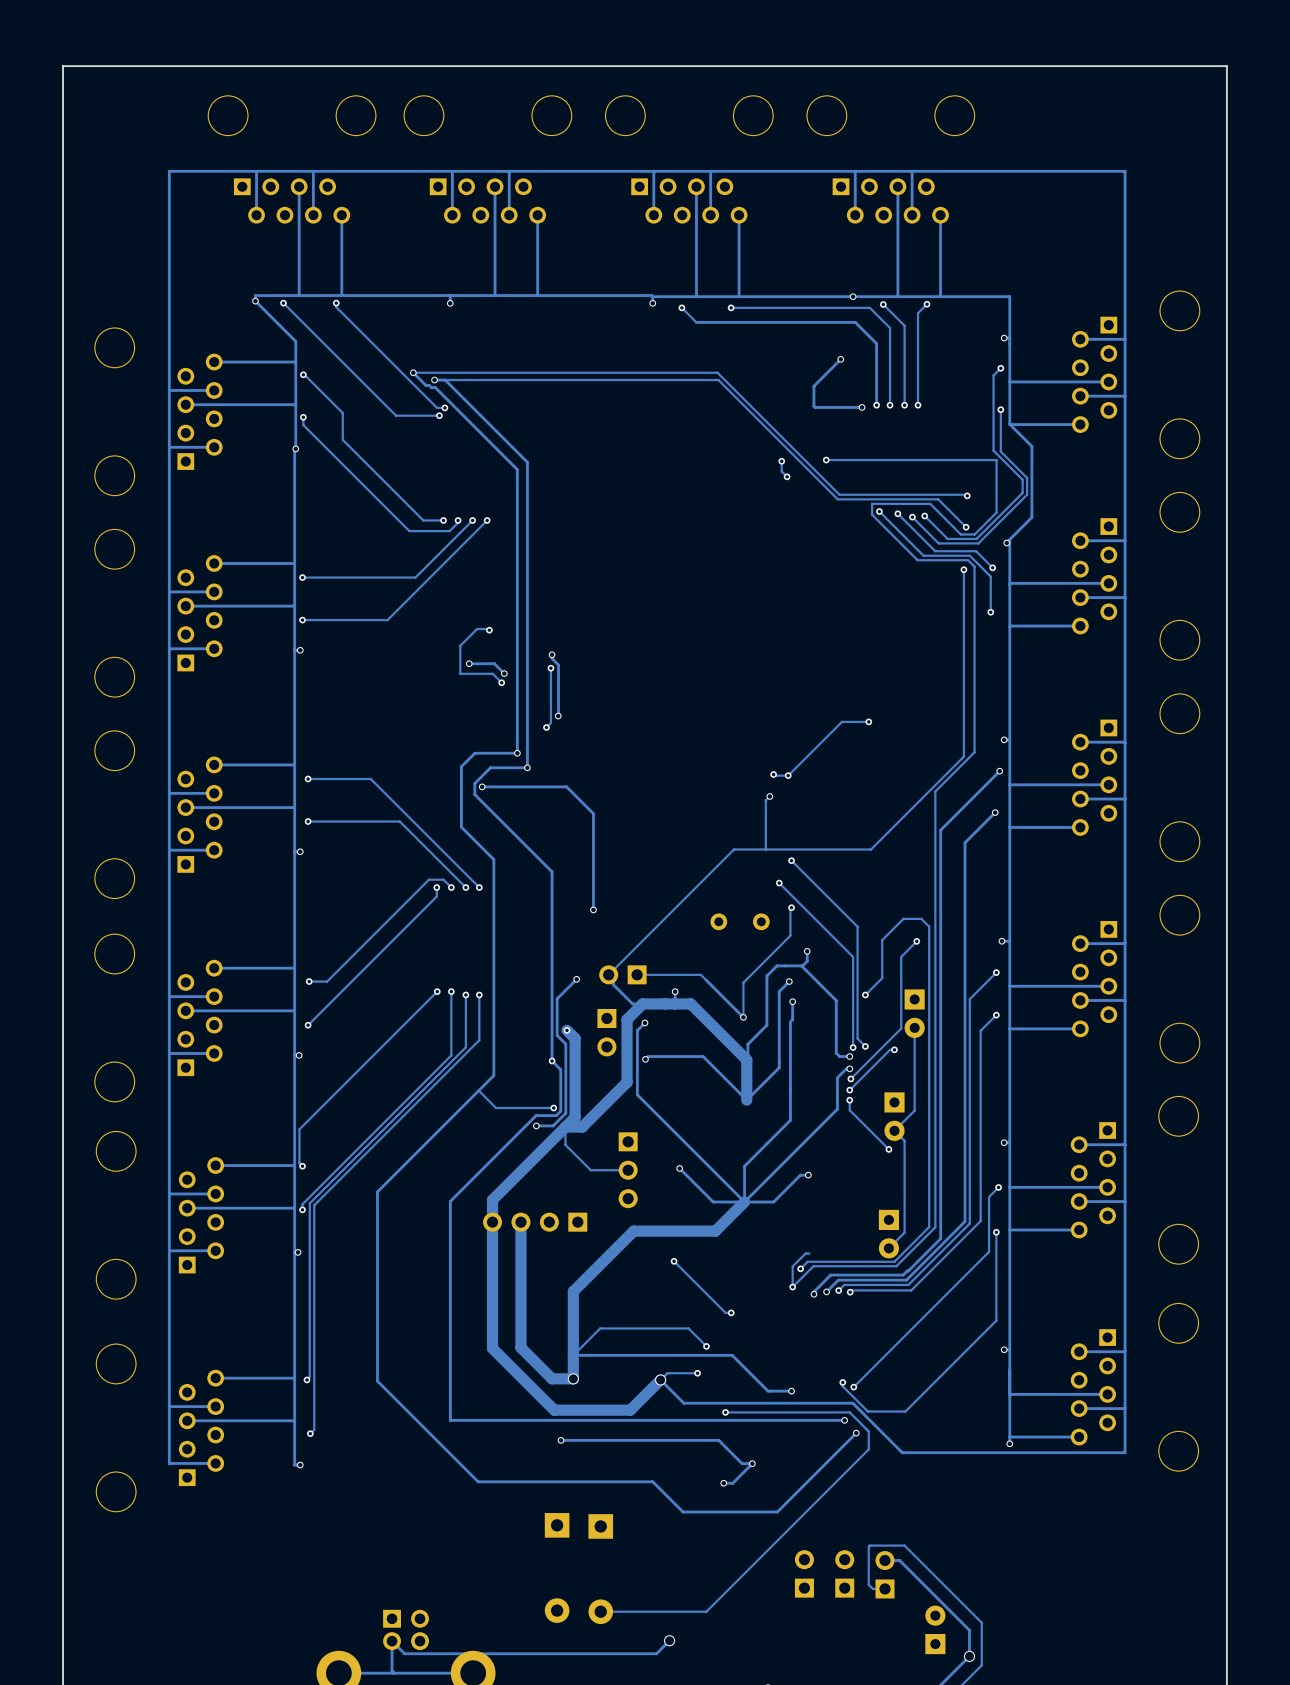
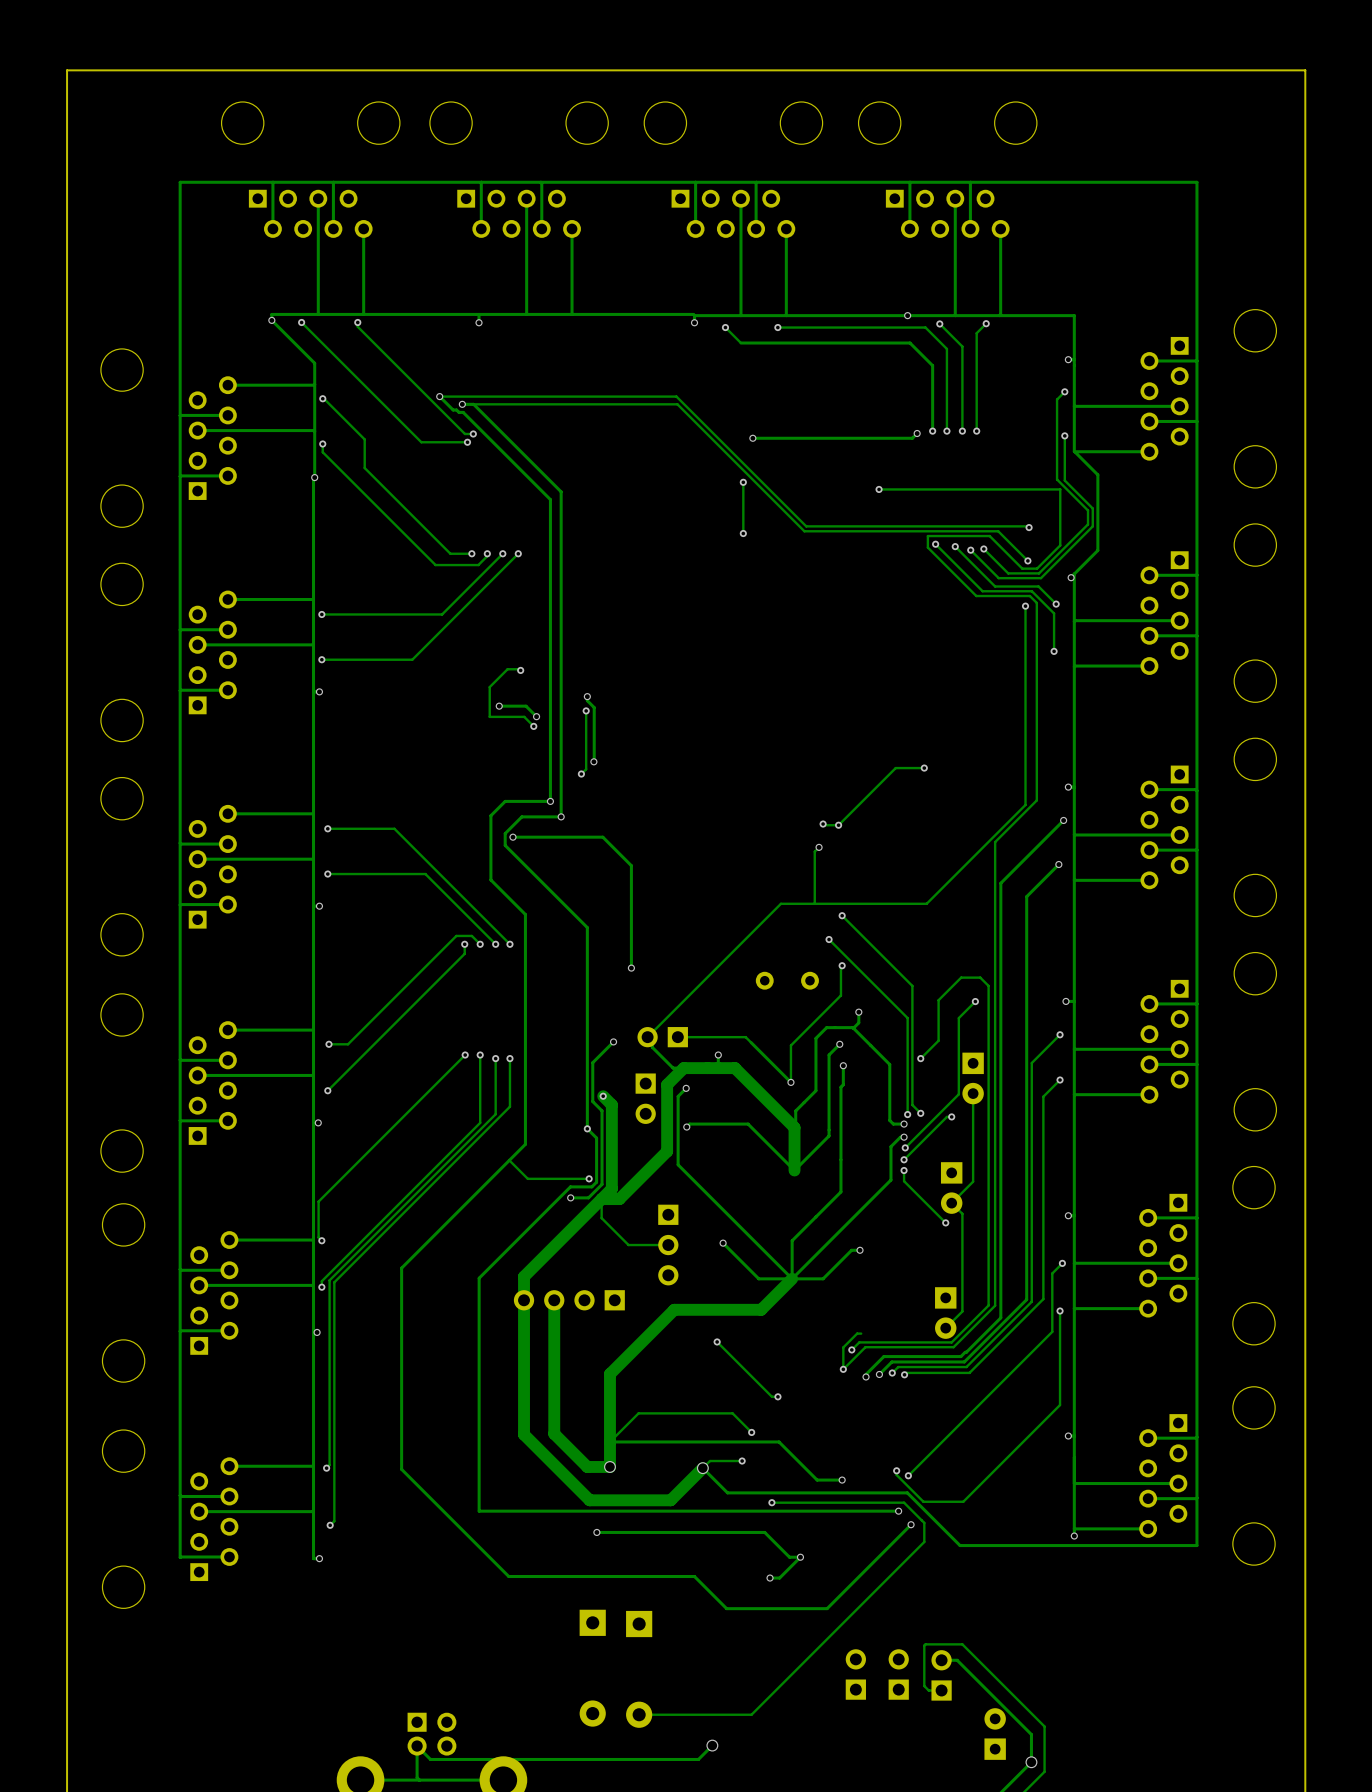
track: (840, 359) (813, 386) (813, 406) (862, 407) -> (752, 438) (912, 438) (917, 433)
via: (840, 359) -> none
track: (635, 372) (717, 372) (839, 494) -> (676, 396) (806, 526) (893, 526)
track: (636, 380) (718, 380) (837, 499) -> (677, 404) (804, 531) (891, 531)
via: none -> (752, 438)
track: none -> (743, 482) (743, 533)
via: none -> (743, 482)
track: (781, 461) (781, 471) (787, 476) -> none
via: (781, 461) -> none
via: (787, 476) -> none
via: none -> (743, 533)

